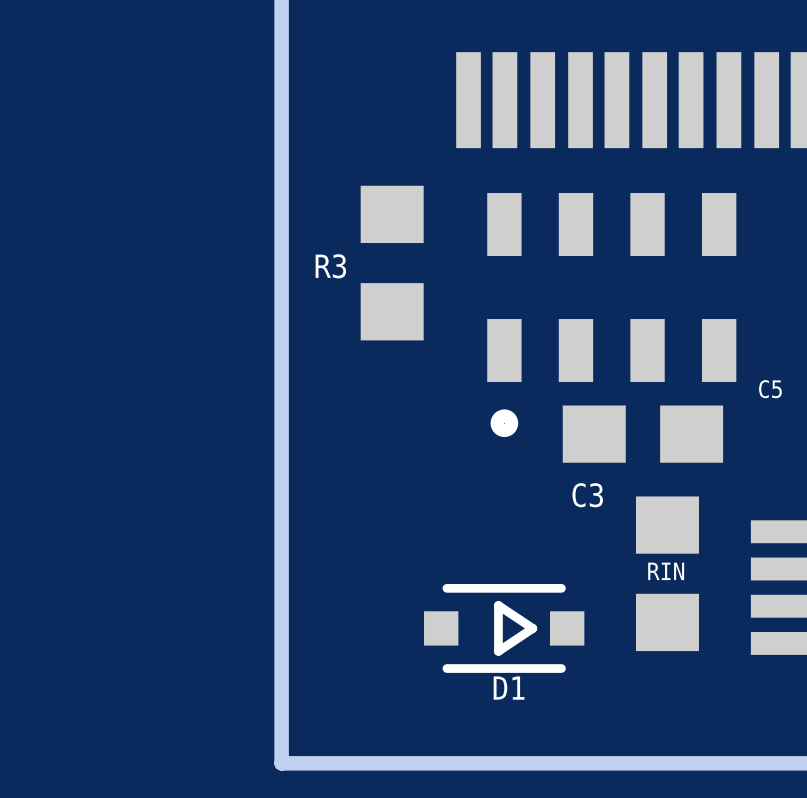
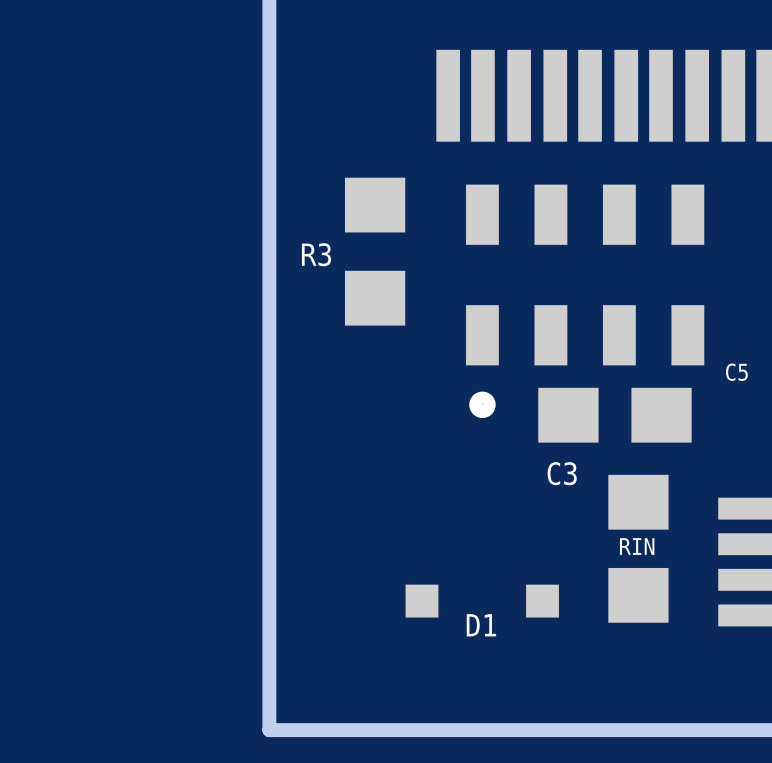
D1 footprint: [424, 583, 585, 673] -> [405, 584, 559, 618]

